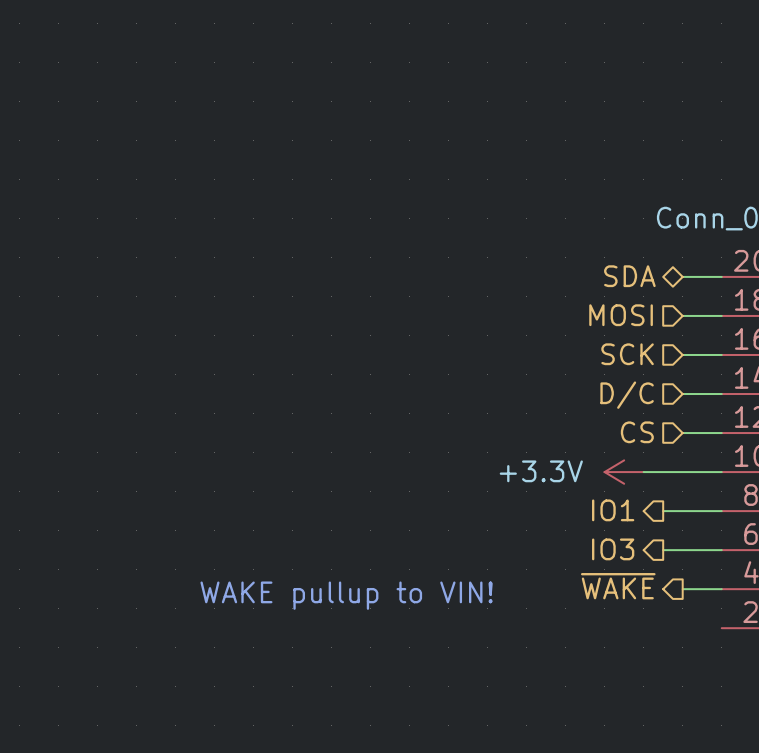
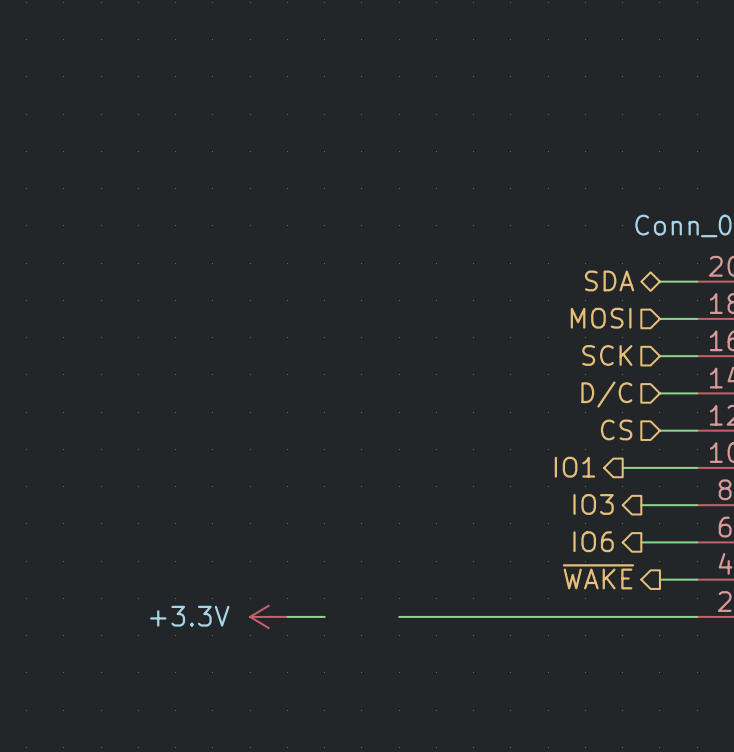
hierarchical label: none -> IO1 (574, 467)
power symbol: +3.3V (624, 472) -> none
hierarchical label: IO1 (613, 510) -> IO3 (593, 504)
hierarchical label: IO3 (613, 549) -> IO6 (593, 541)
text: WAKE pullup to VIN! (346, 595) -> none
power symbol: none -> +3.3V (268, 616)
wire: none -> (287, 616) (324, 616)
wire: none -> (399, 616) (697, 616)

